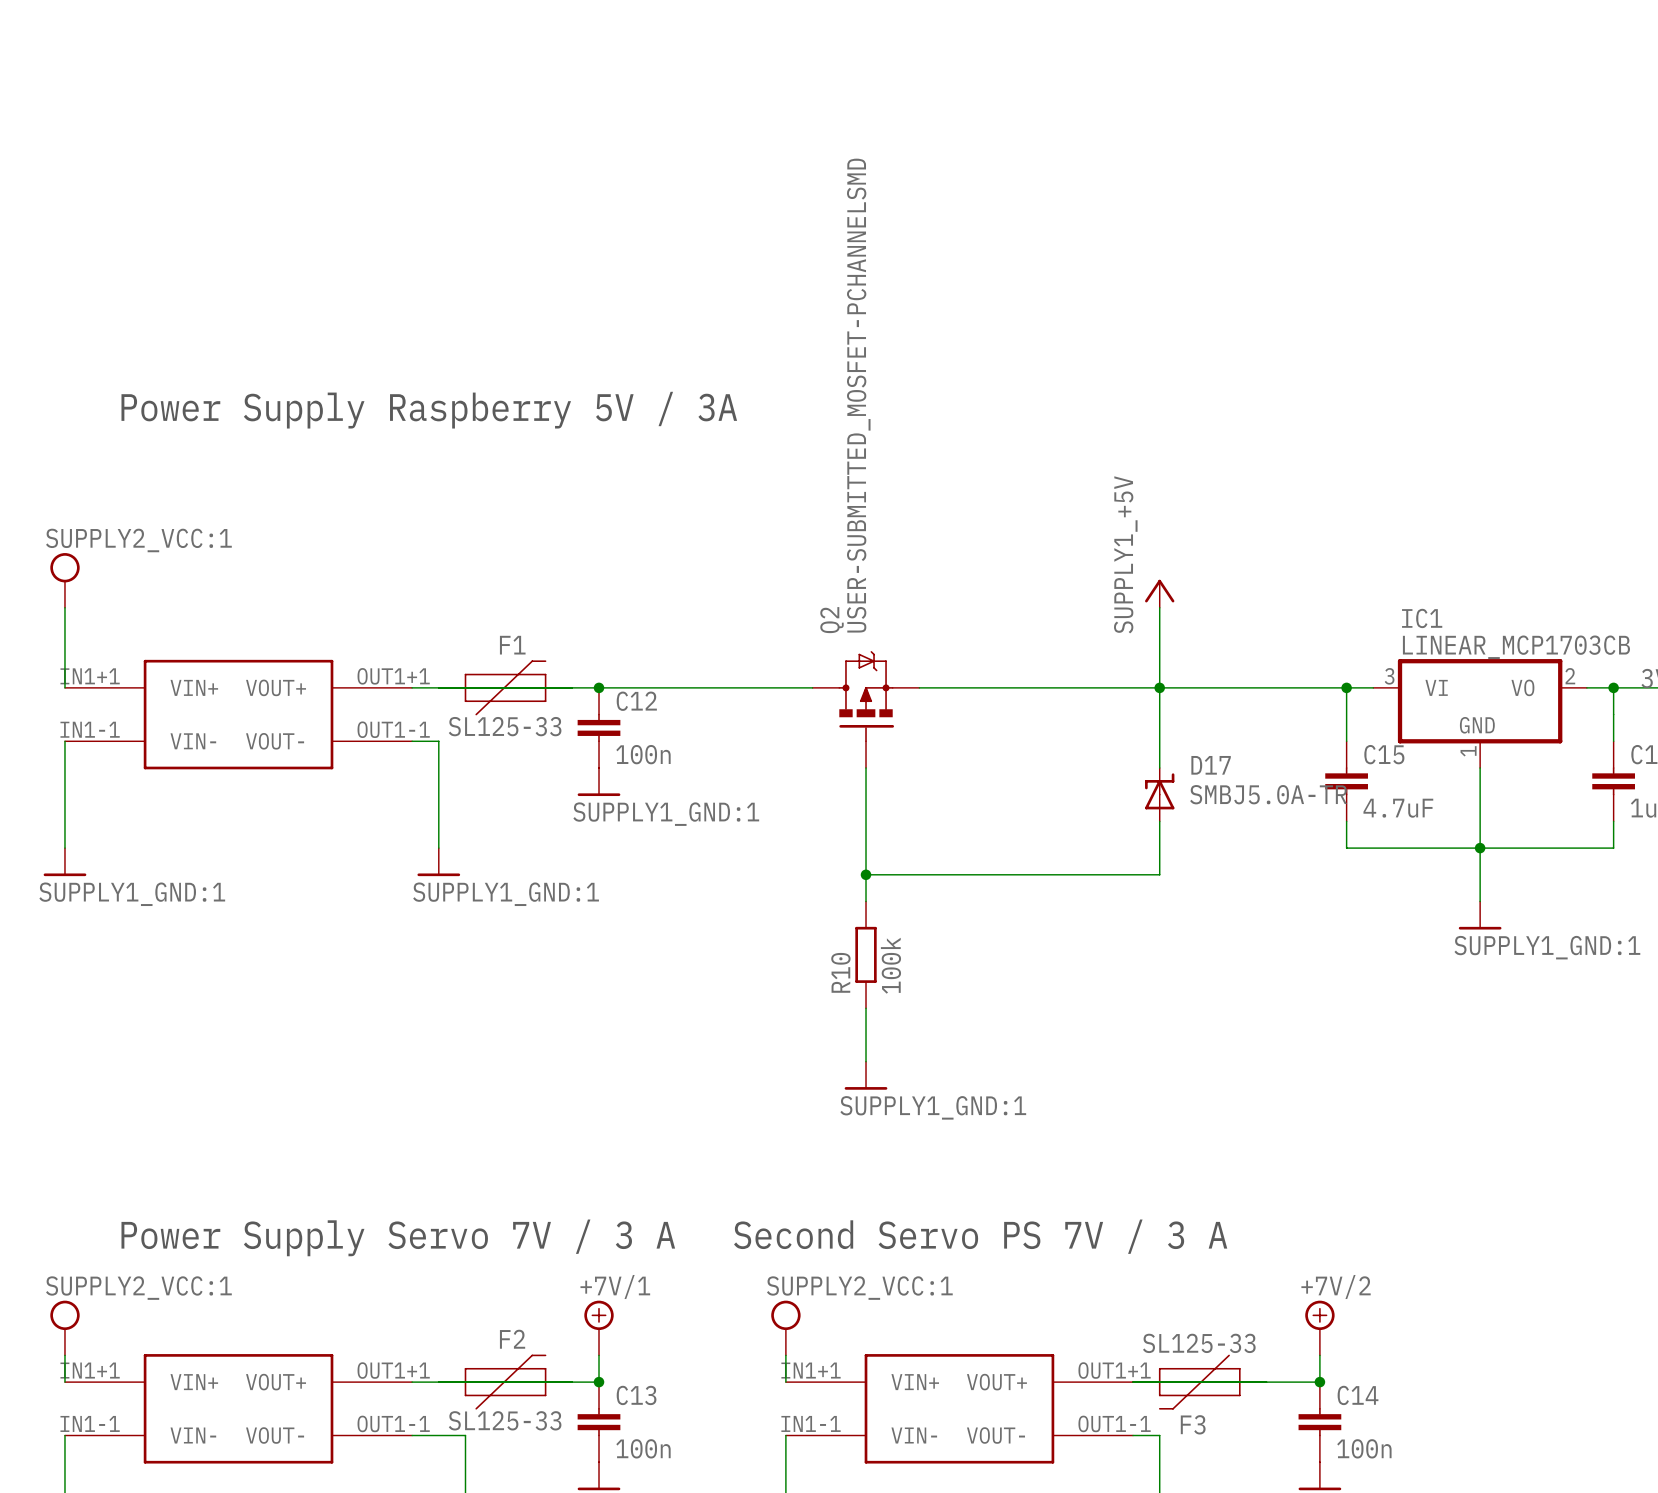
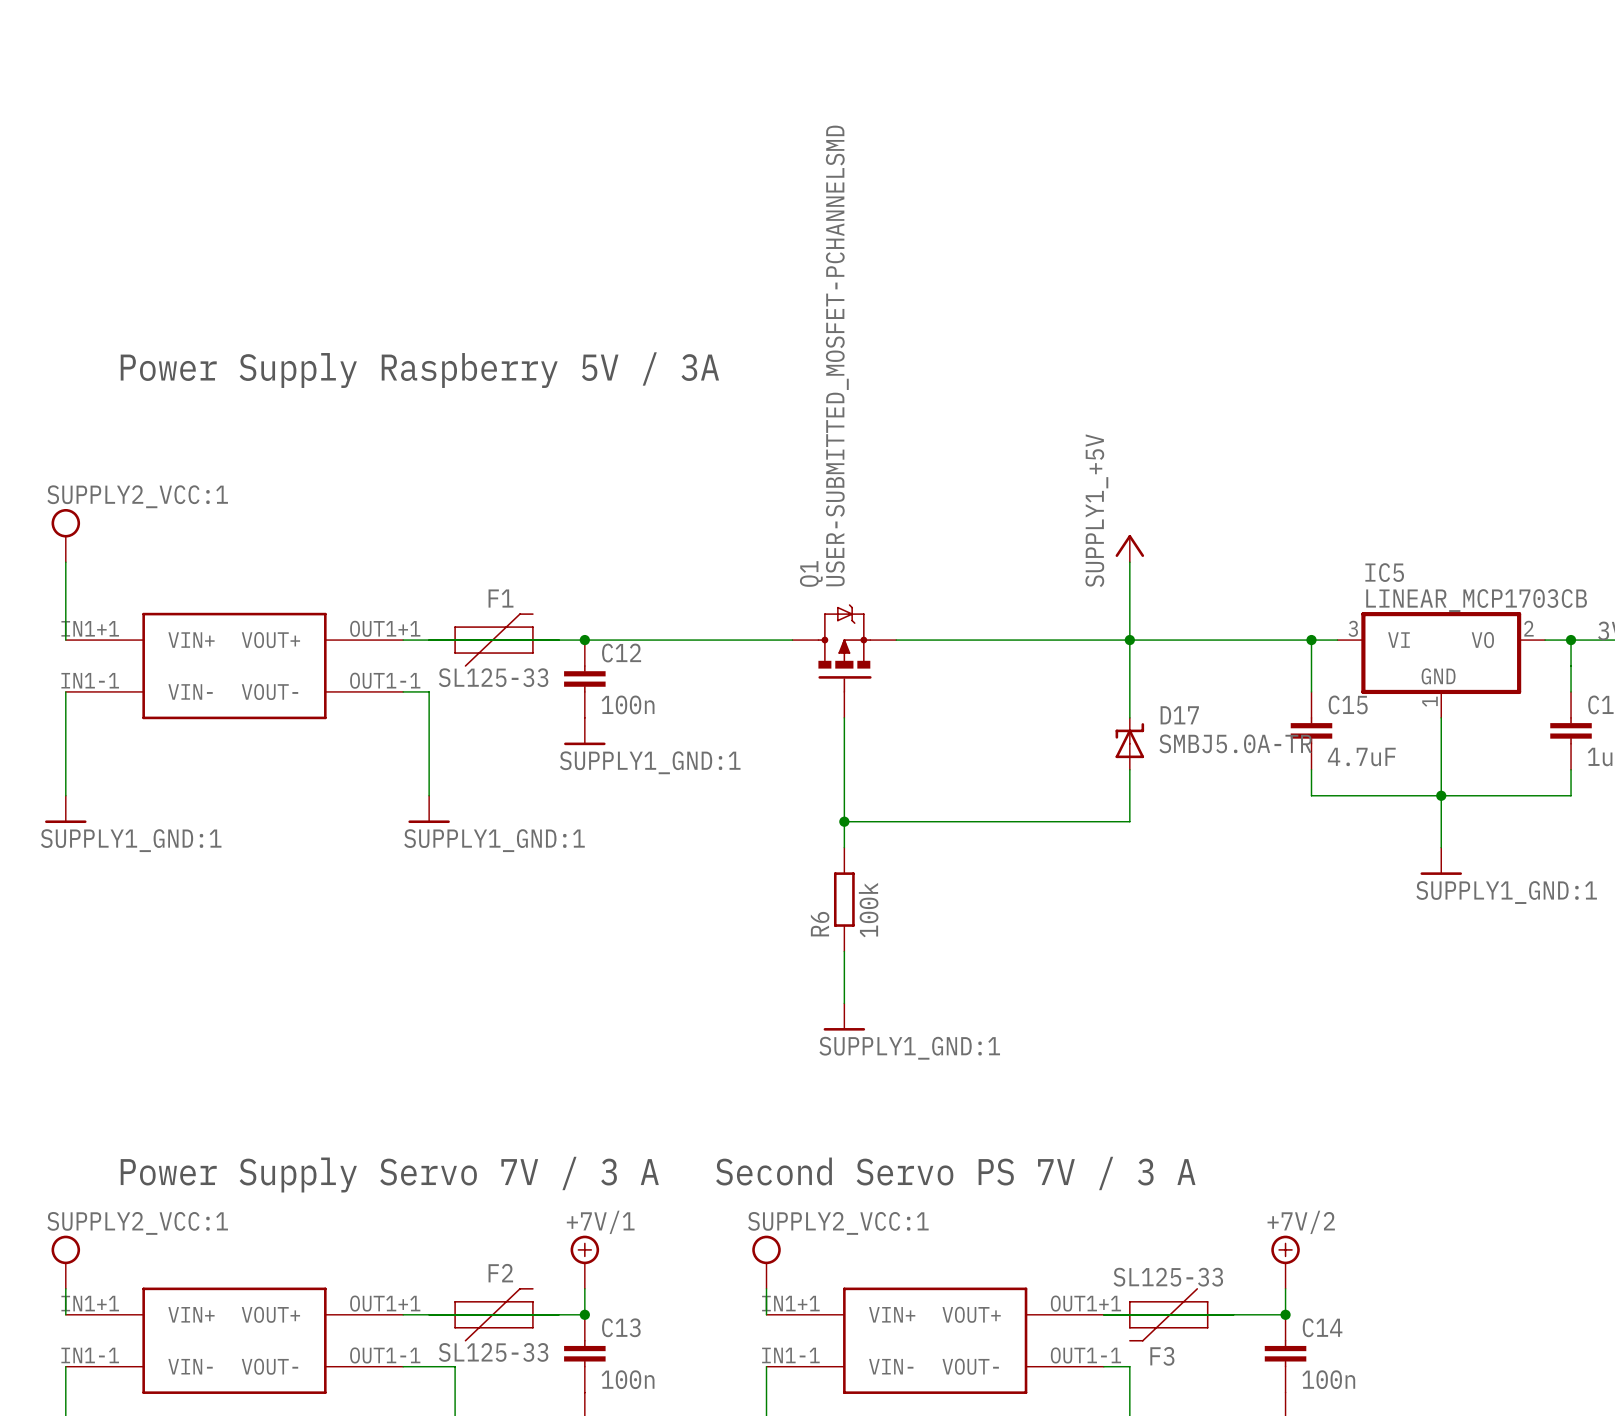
IC1 name: IC1 (1422, 618) -> IC5 (1384, 572)
Q2 name: Q2 (831, 620) -> Q1 (811, 573)
R10 name: R10 (840, 972) -> R6 (820, 924)

